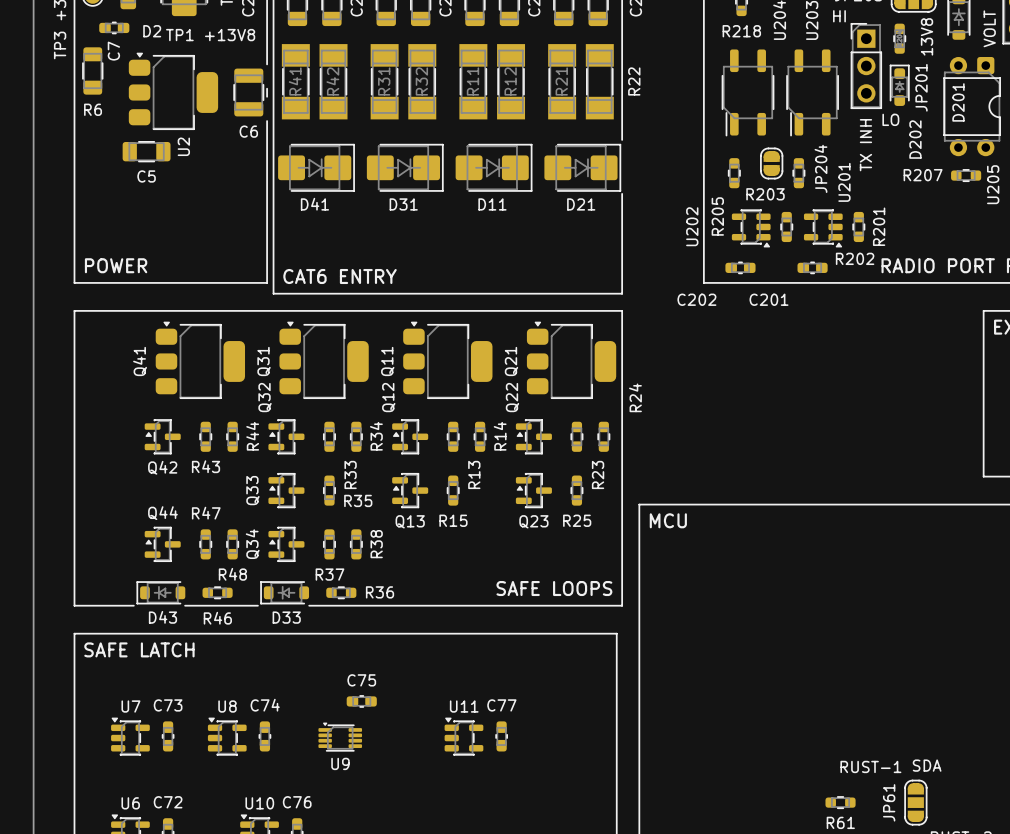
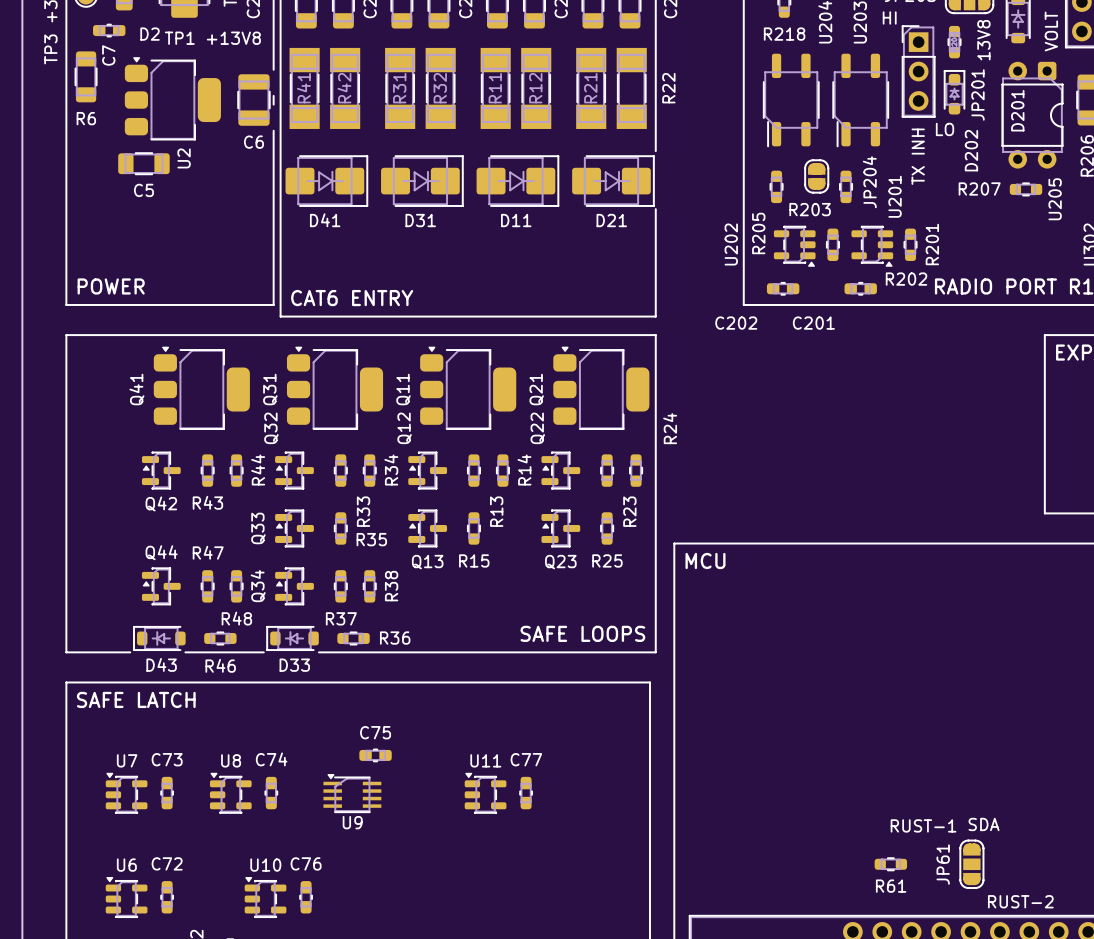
U9 footprint: [318, 722, 363, 752] -> [323, 774, 382, 813]

